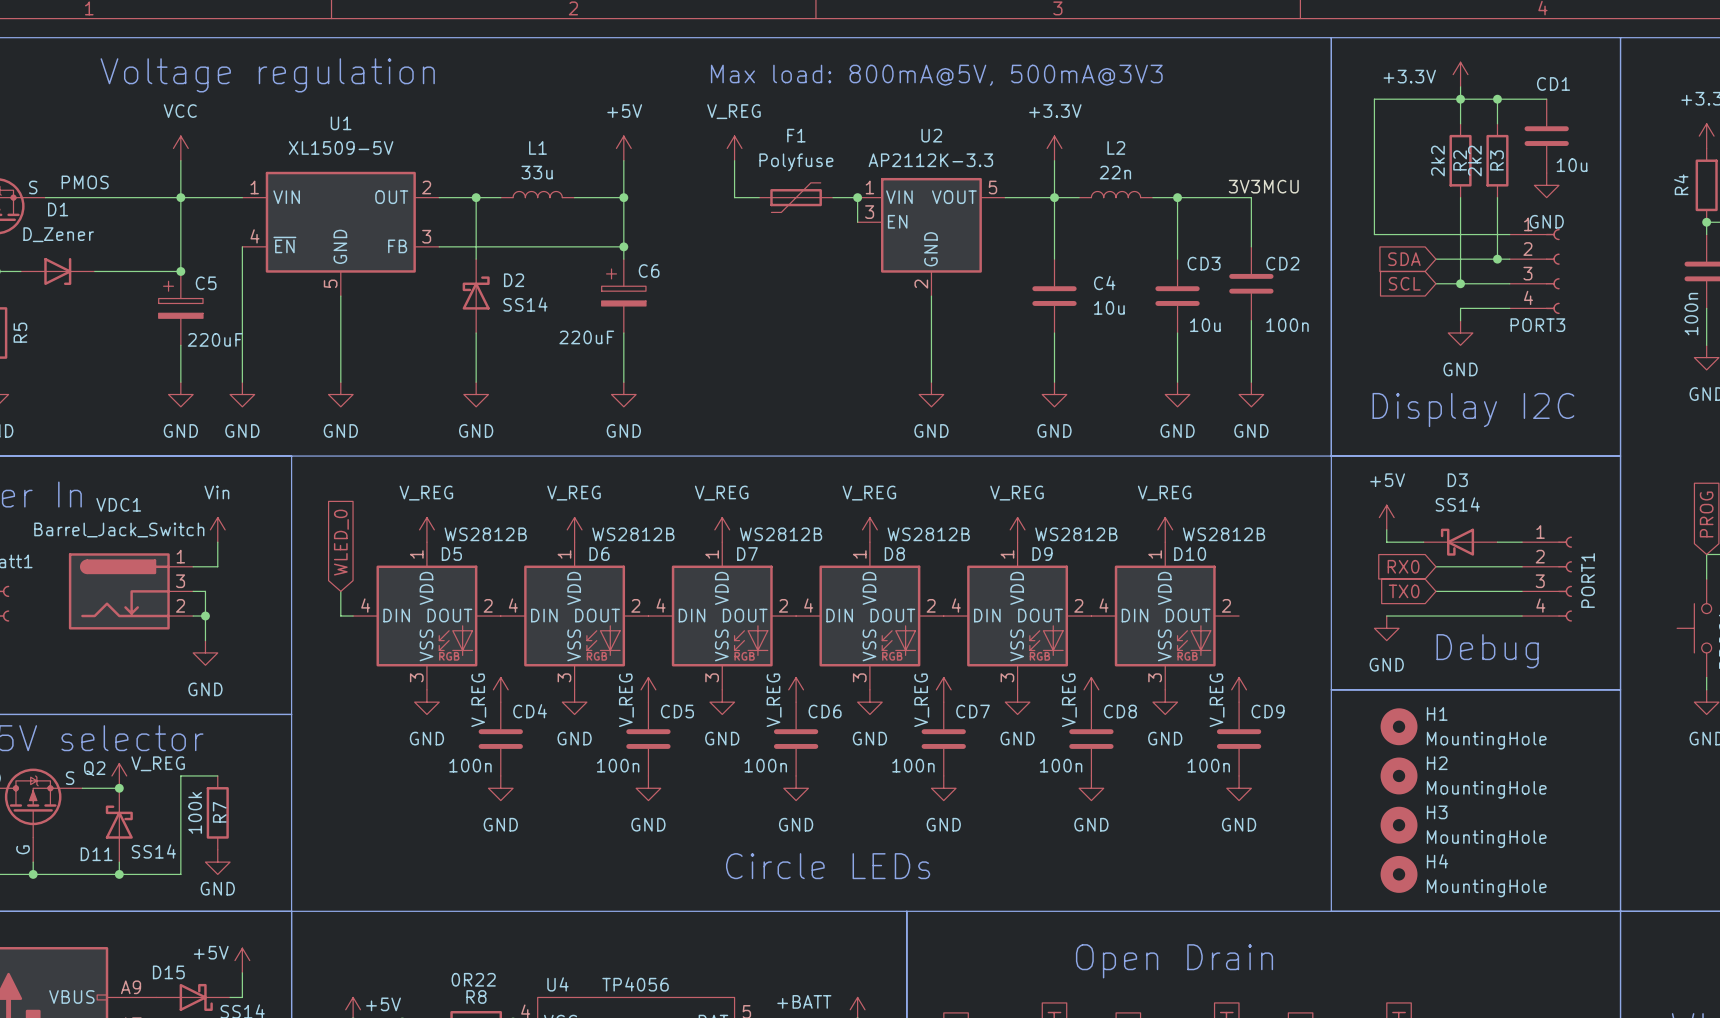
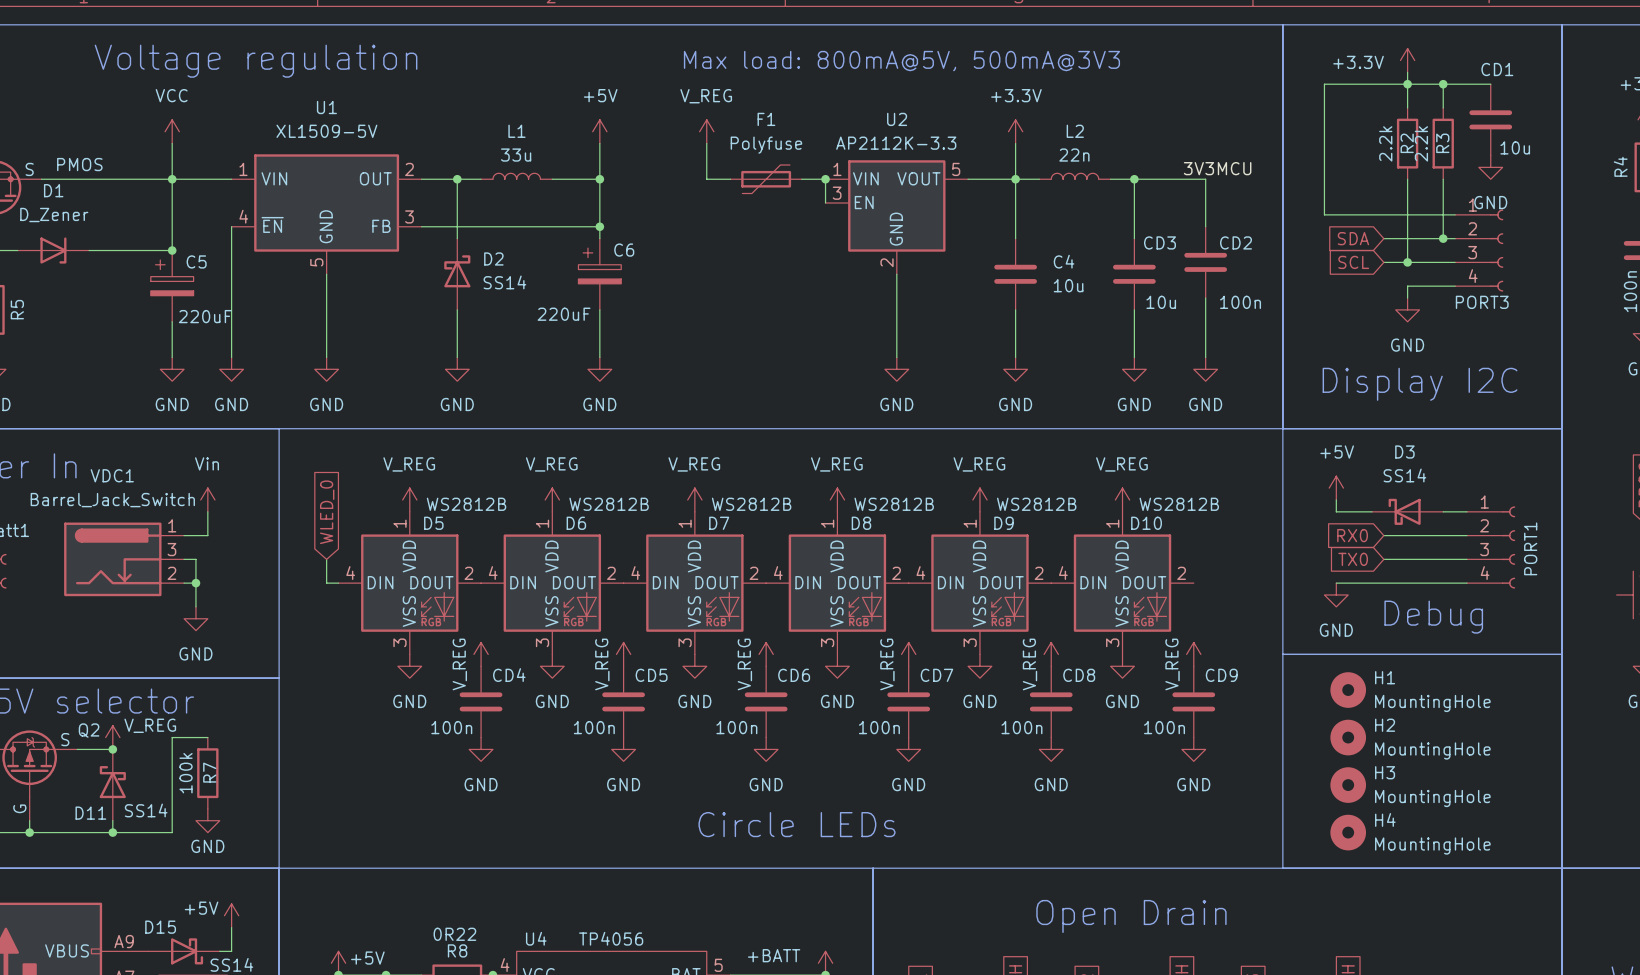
R2 value: 2k2 (1437, 161) -> 2.2k (1385, 143)
R3 value: 2k2 (1474, 161) -> 2.2k (1421, 143)

